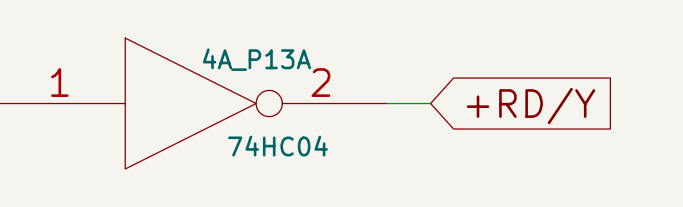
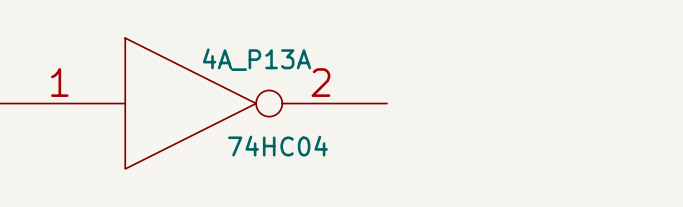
wire: (387, 103) (430, 103) -> none
global label: +RD/Y (530, 106) -> none

